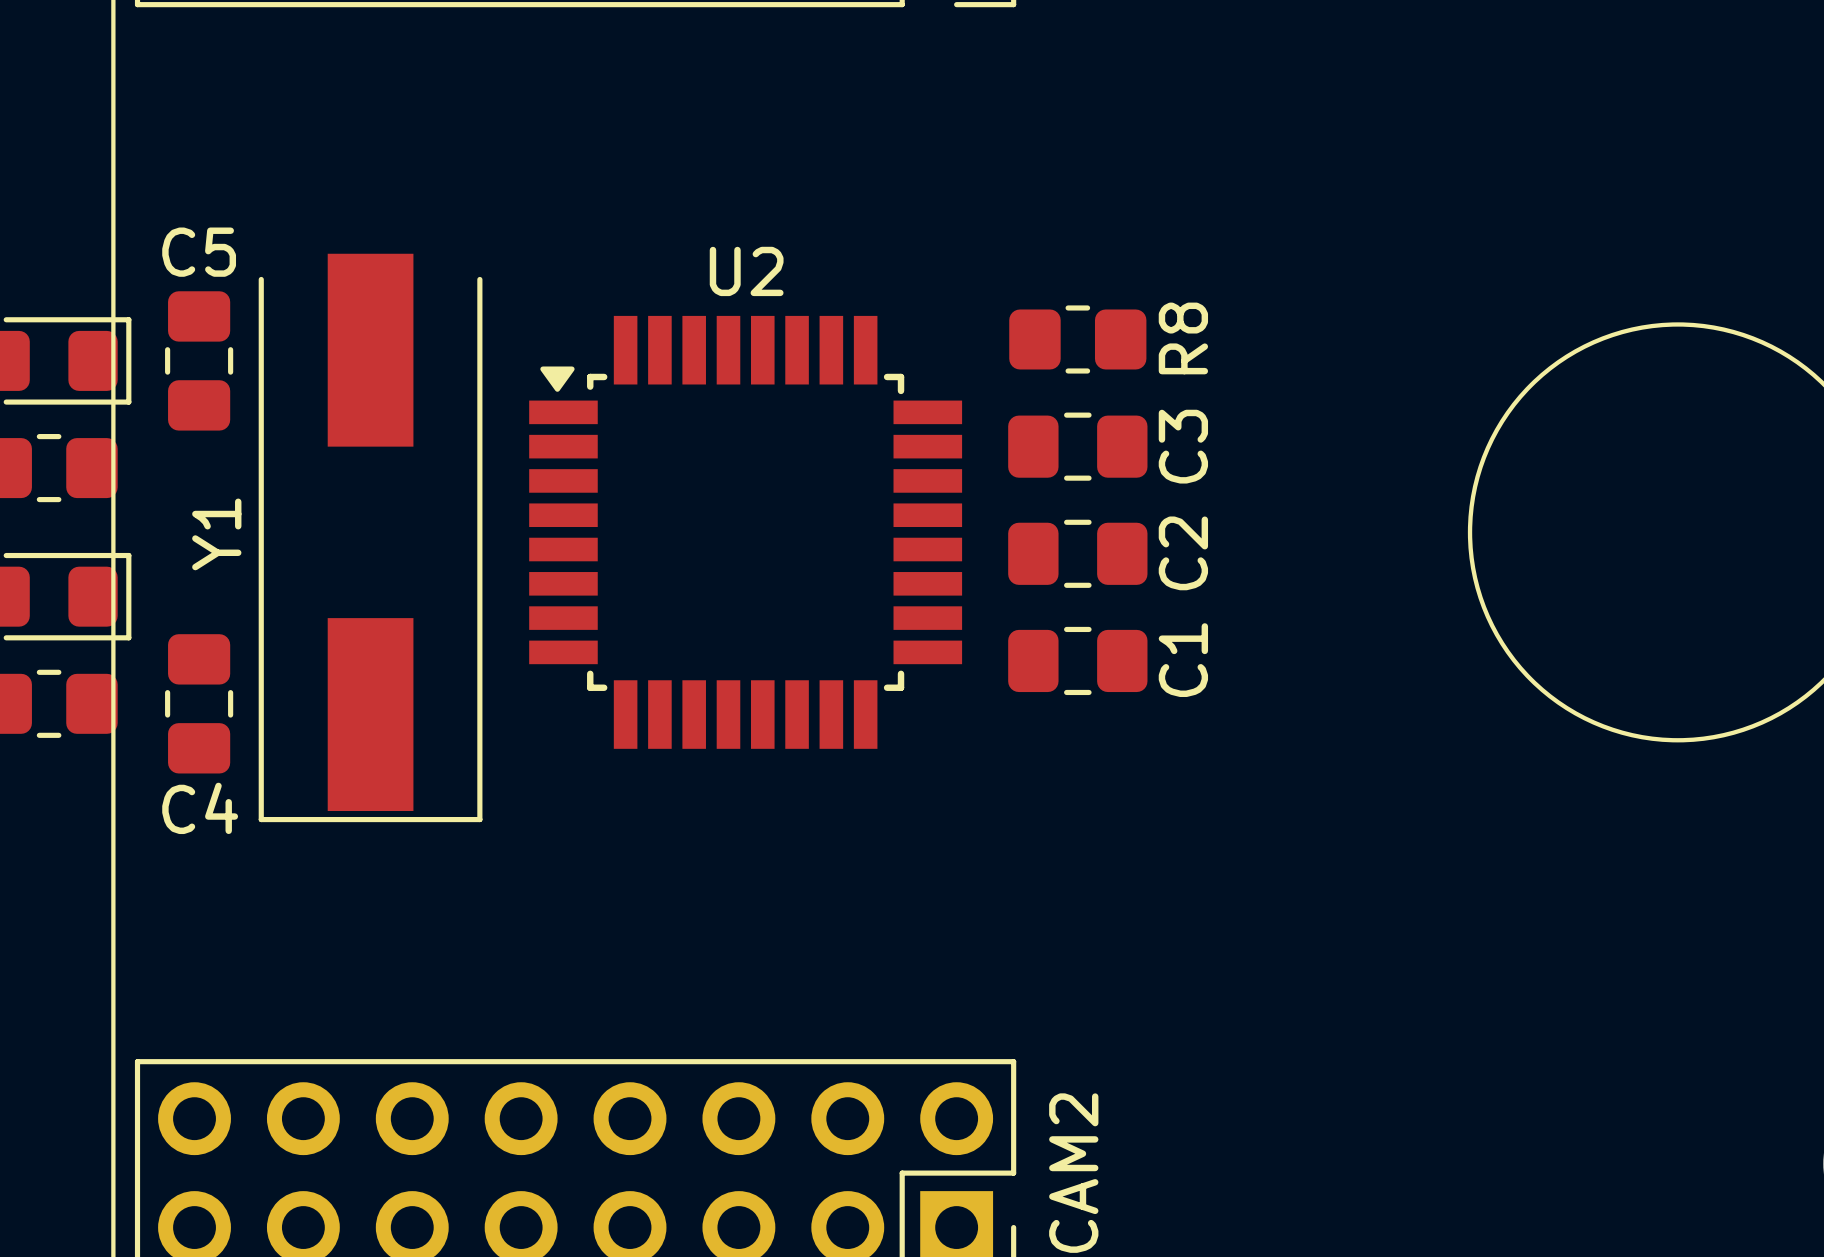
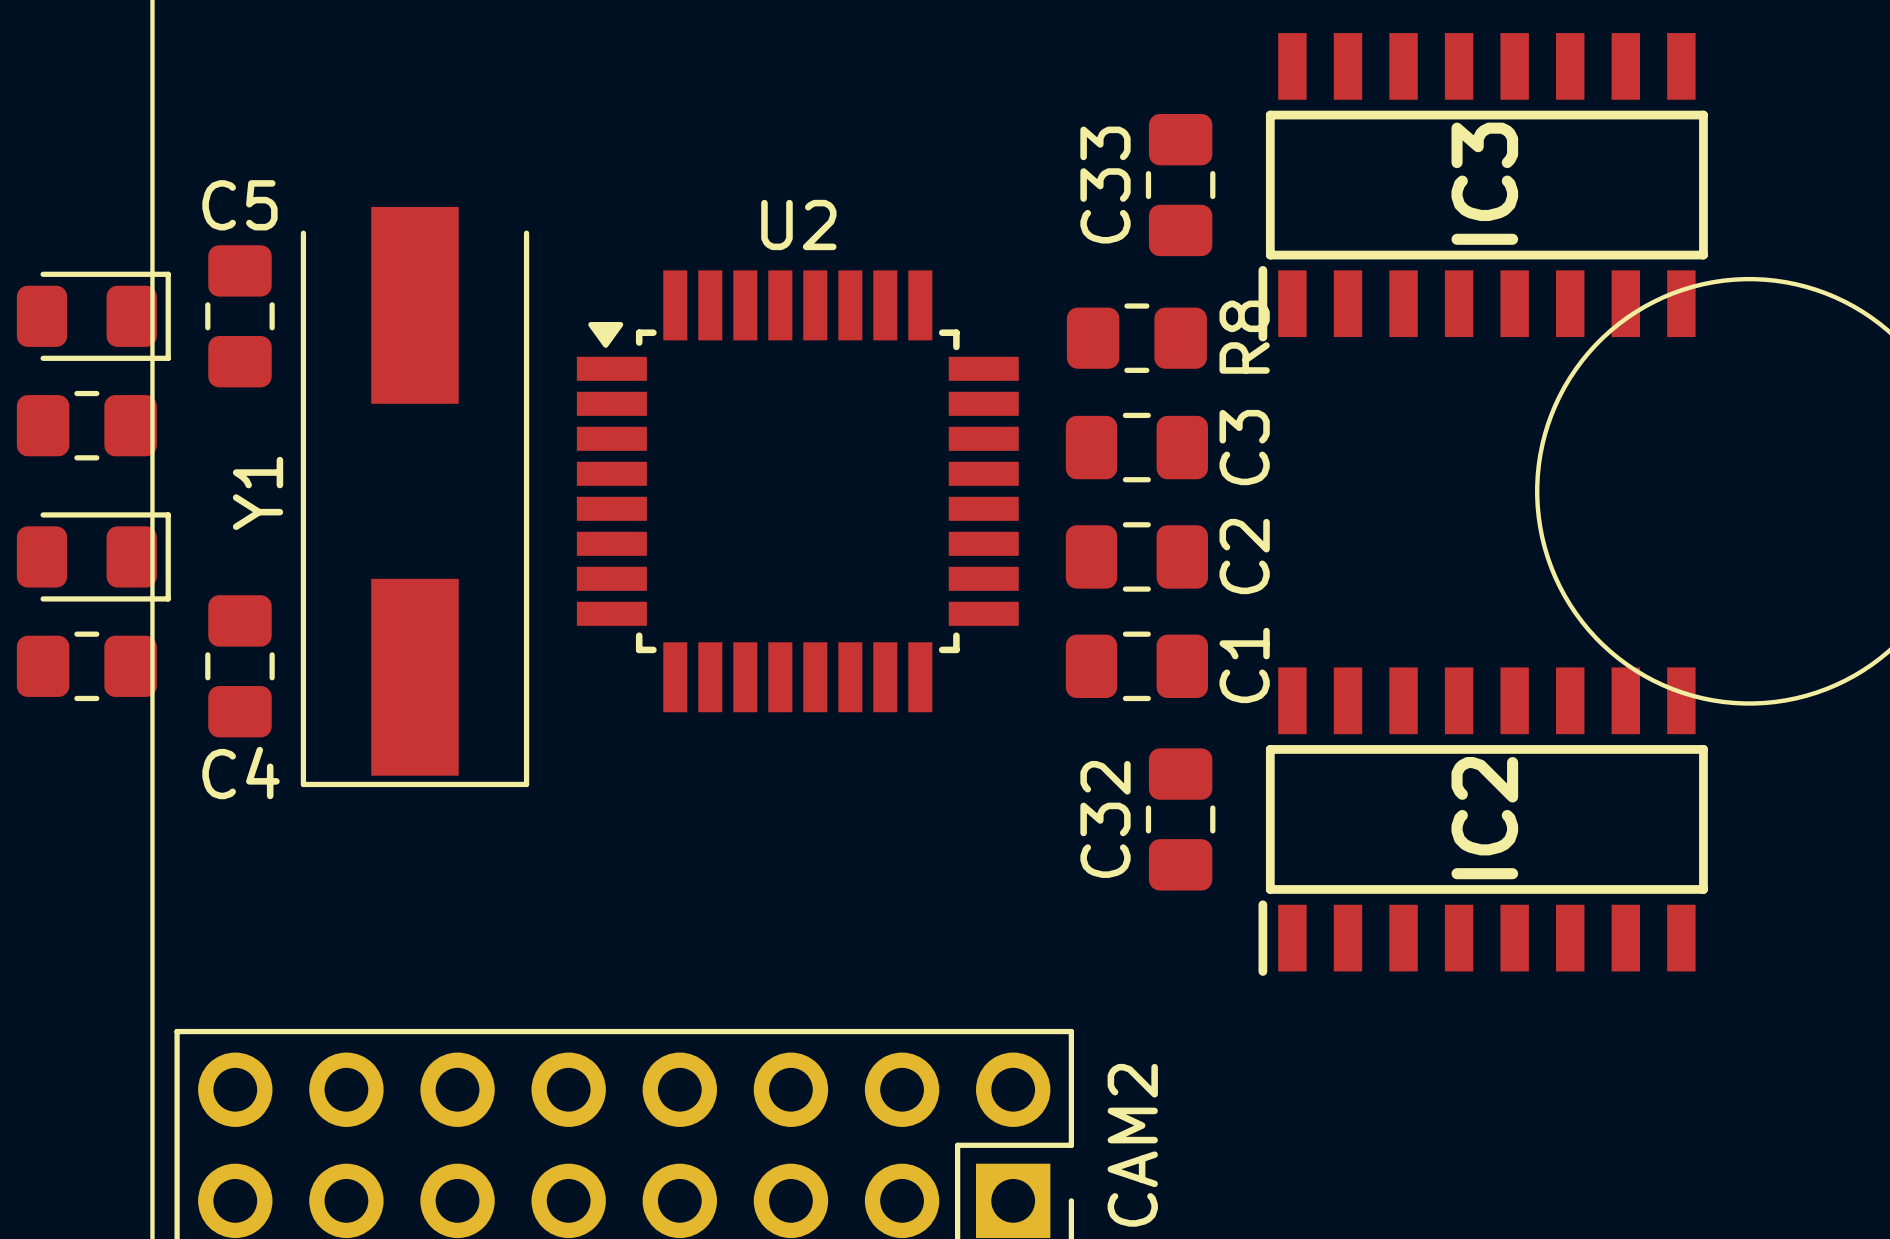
C33: none -> (1180, 185)
IC3: none -> (1483, 187)
R8 position: (1077, 339) -> (1136, 338)
C3 position: (1077, 446) -> (1136, 447)
C2 position: (1077, 553) -> (1136, 556)
C1 position: (1077, 660) -> (1136, 666)
C32: none -> (1180, 819)
IC2: none -> (1483, 821)

